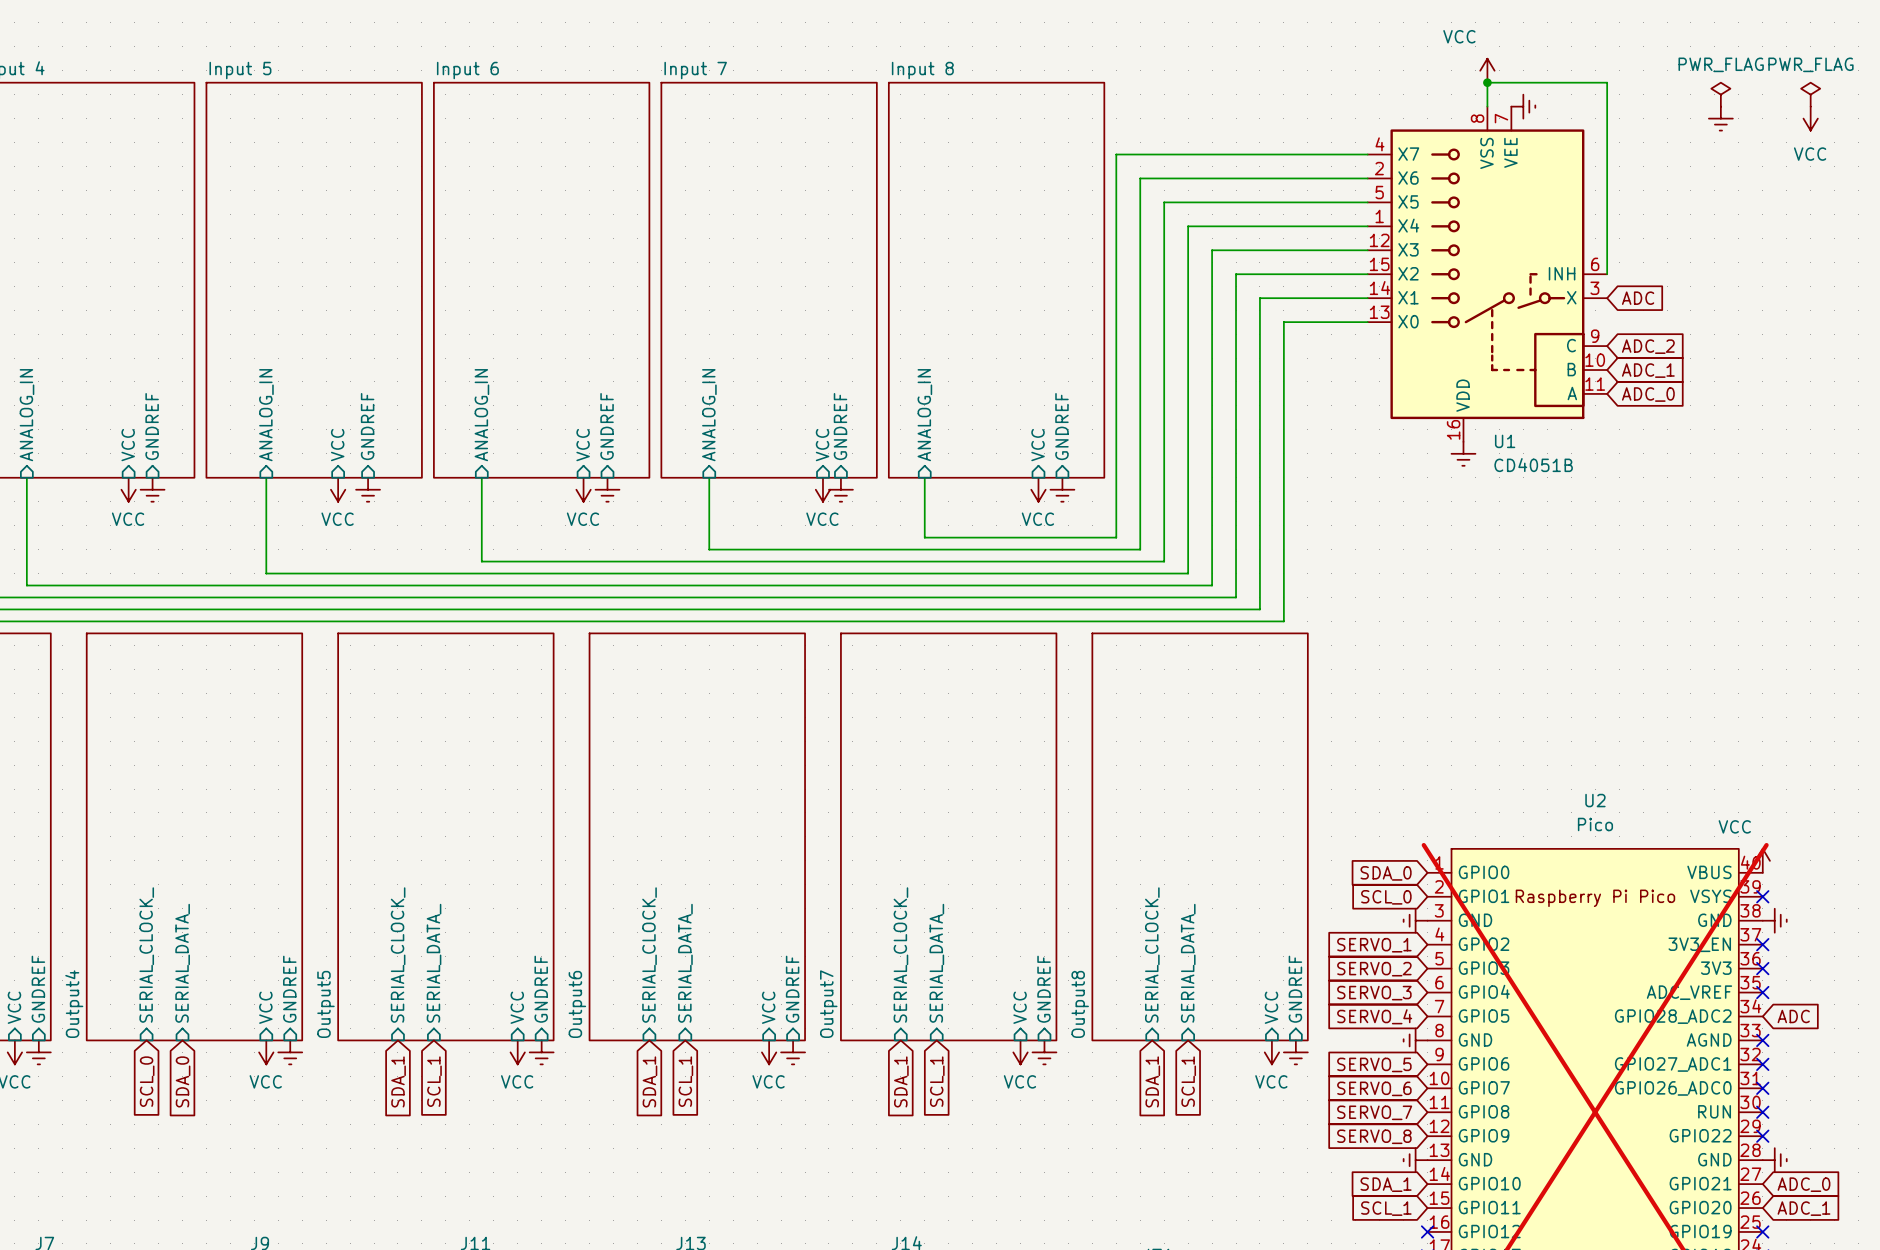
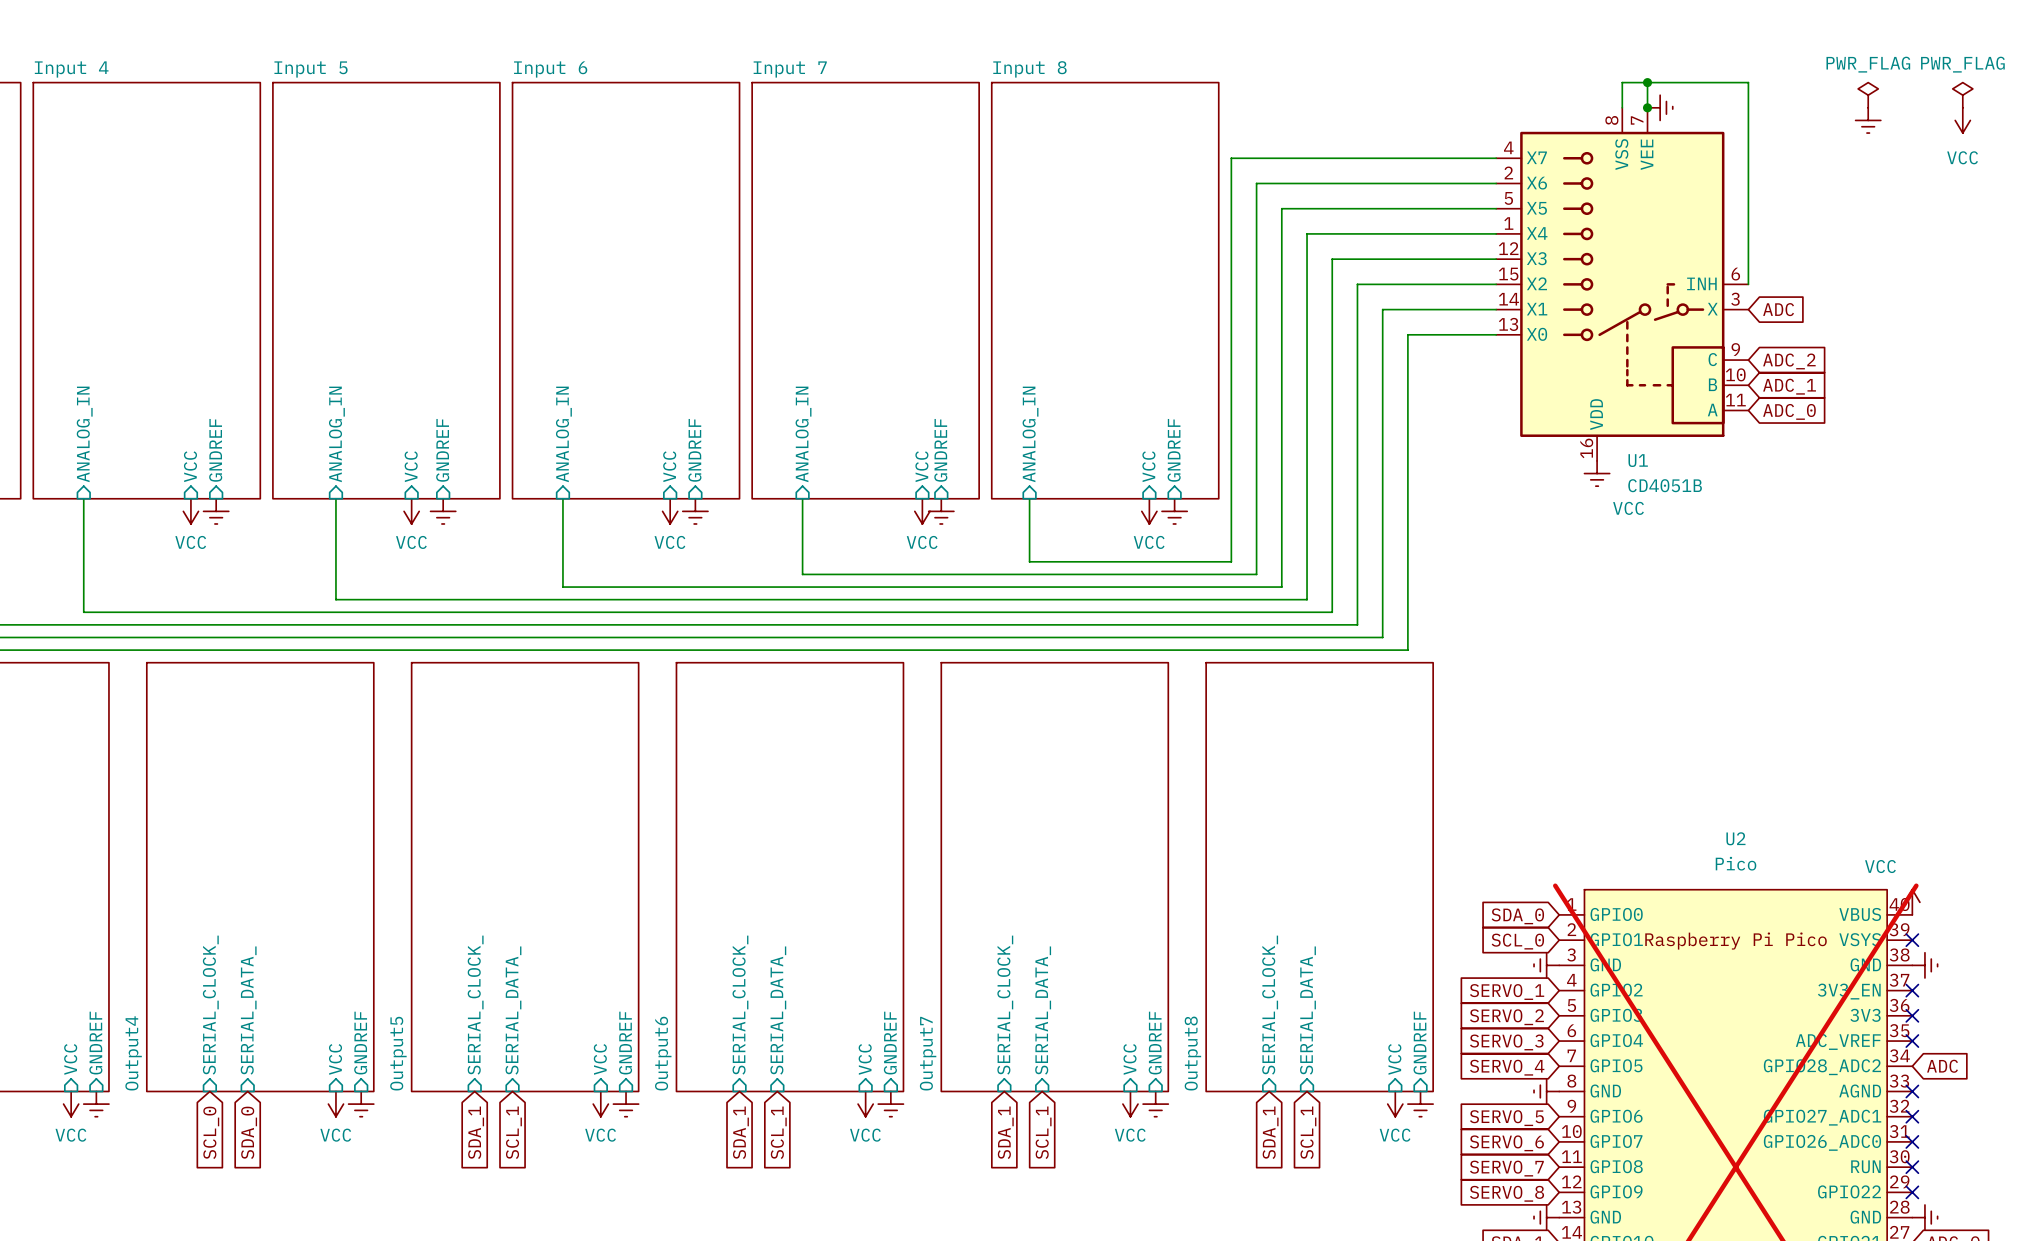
power symbol: VCC (1487, 70) -> none
junction: (1487, 82) -> none
wire: none -> (1647, 82) (1647, 107)
junction: none -> (1647, 82)
junction: none -> (1647, 107)
power symbol text: none -> VCC (1628, 508)

